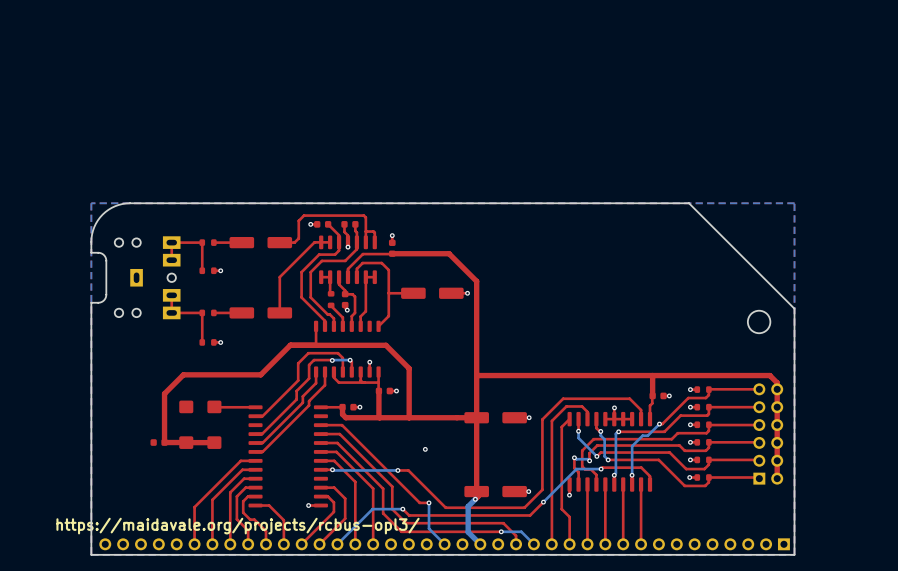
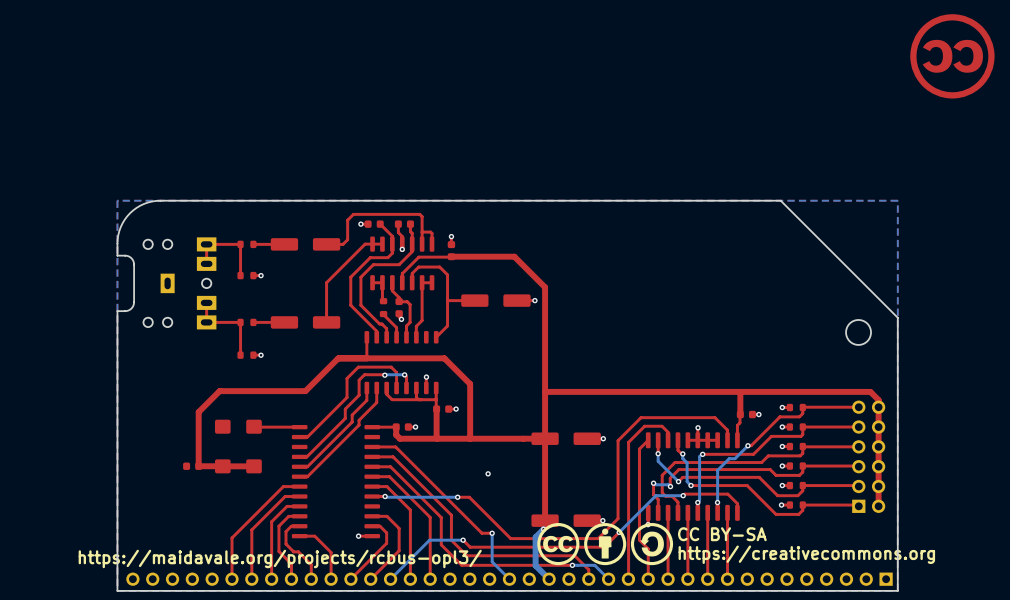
drawing: none -> [910, 14, 995, 99]
drawing: none -> [537, 523, 674, 566]
text: none -> CC BY-SA (722, 534)
text: none -> https://creativecommons.org (806, 554)

